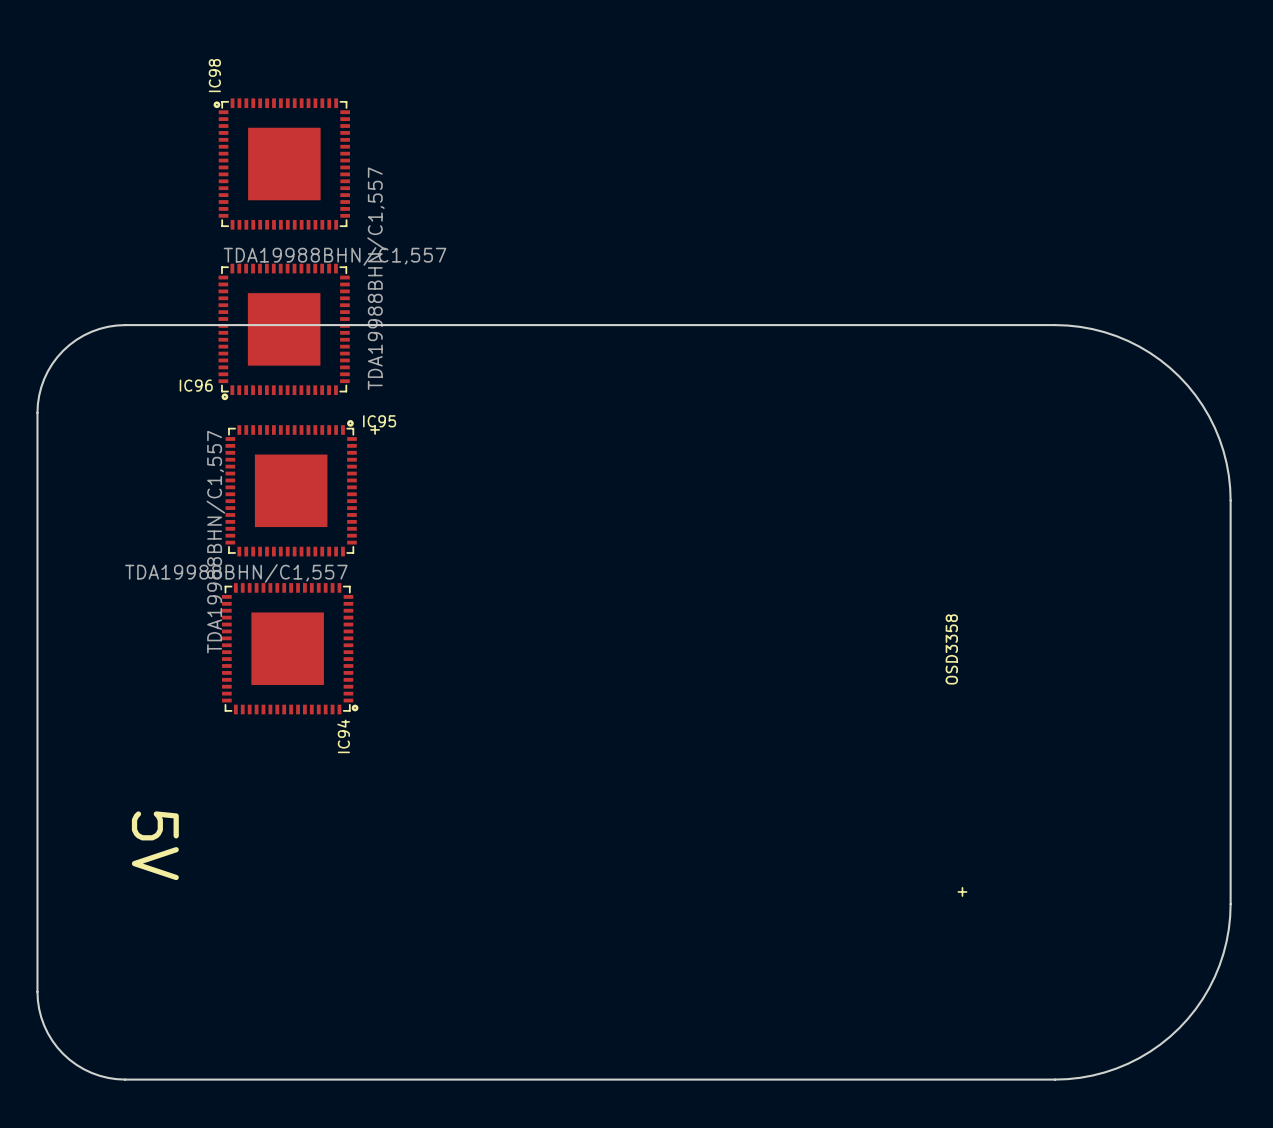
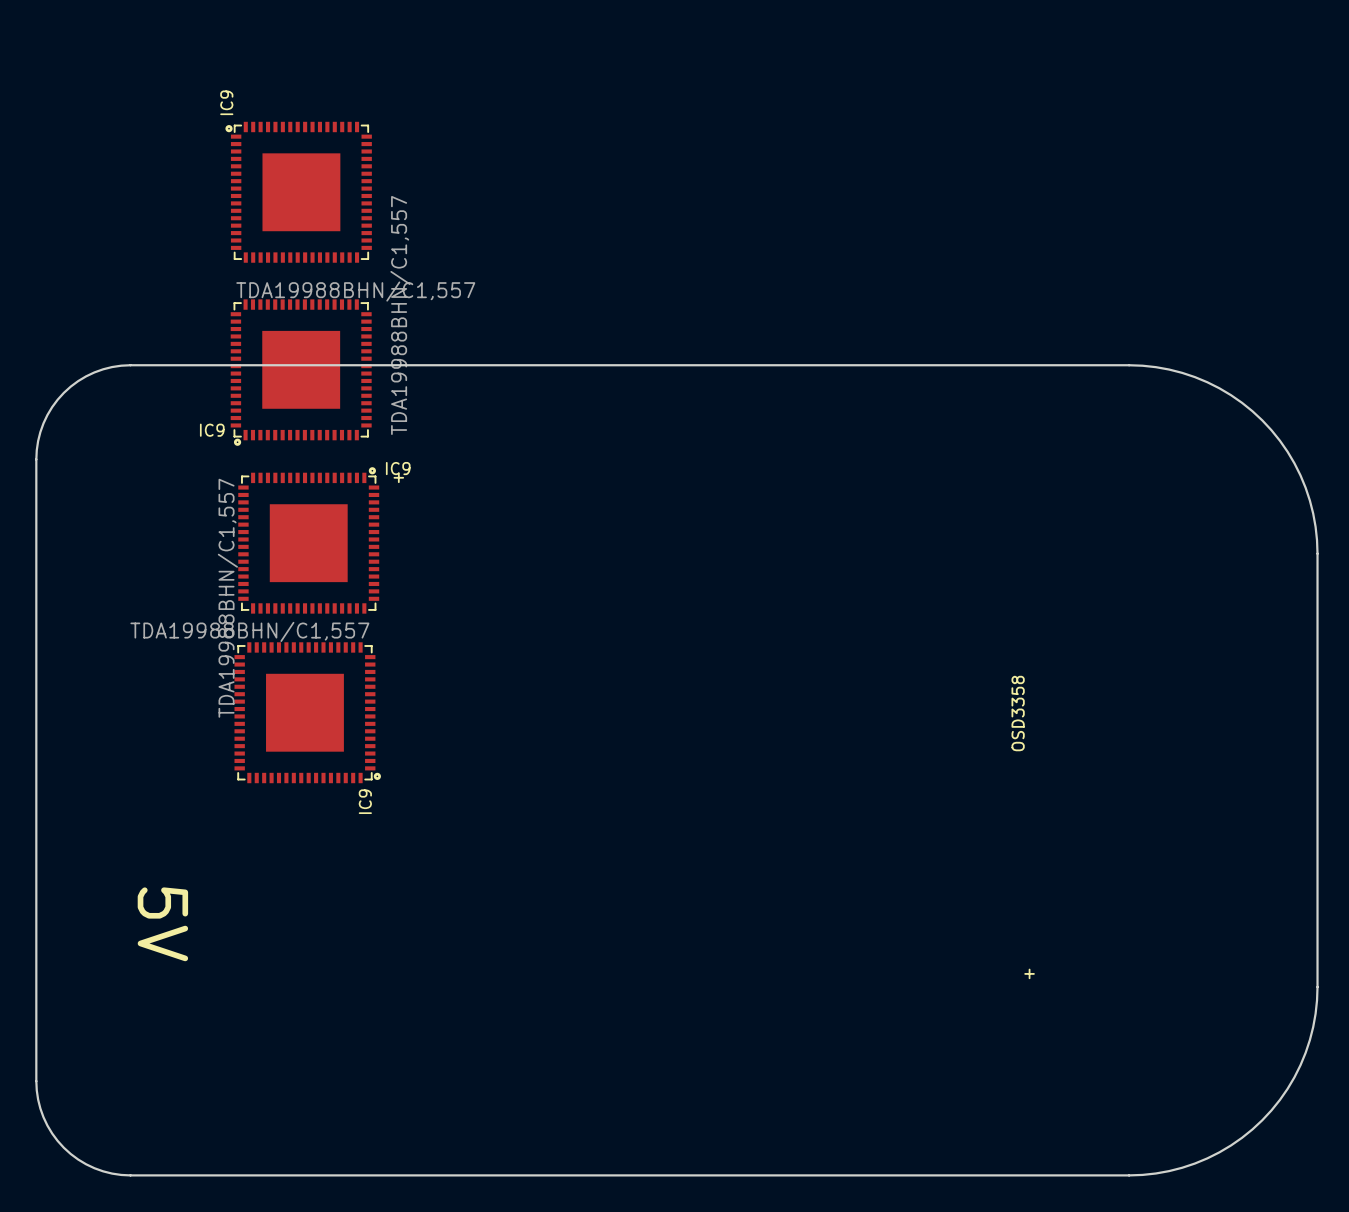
IC98 name: IC98 (214, 75) -> IC9 (226, 102)
IC96 name: IC96 (196, 385) -> IC9 (212, 430)
IC95 name: IC95 (379, 421) -> IC9 (398, 468)
IC94 name: IC94 (343, 736) -> IC9 (365, 801)

